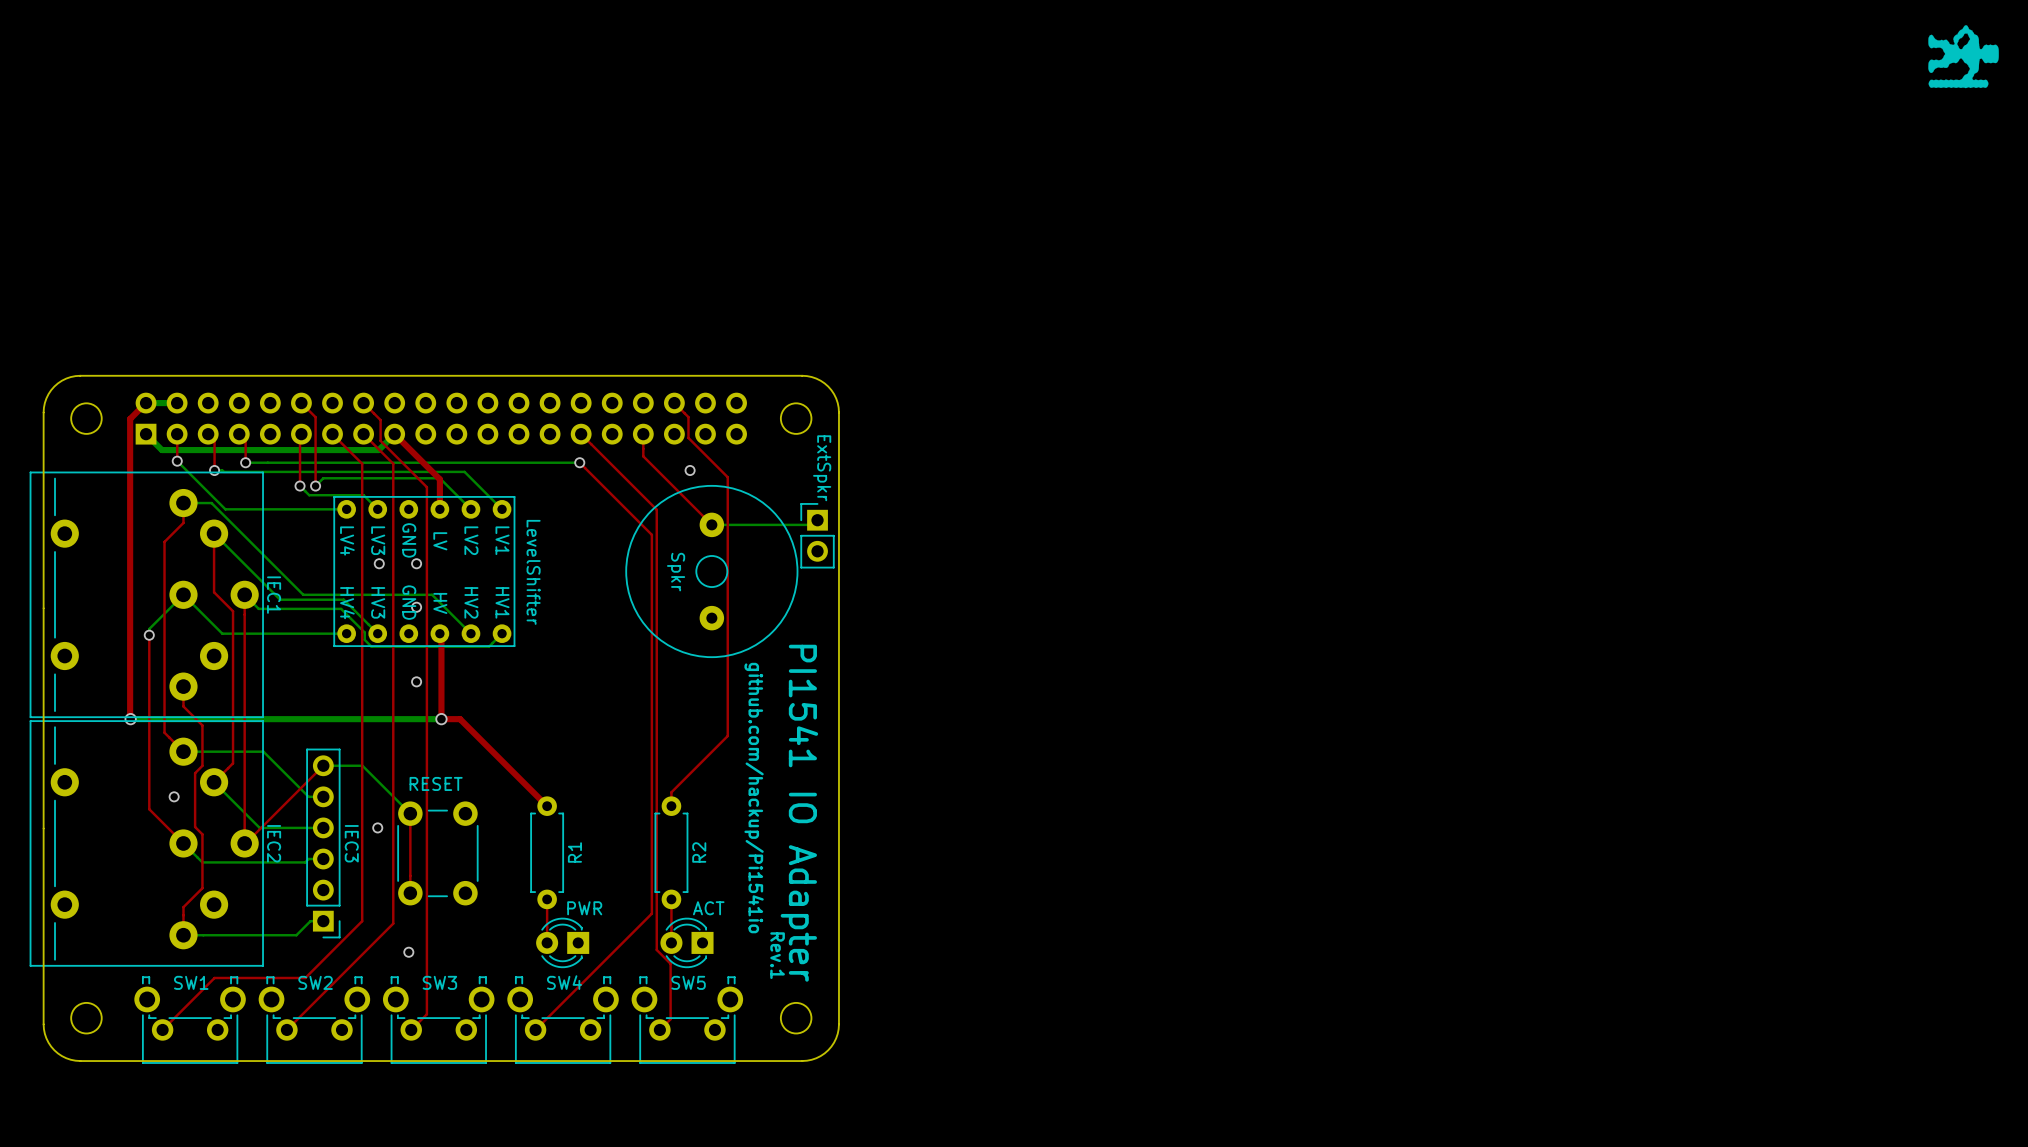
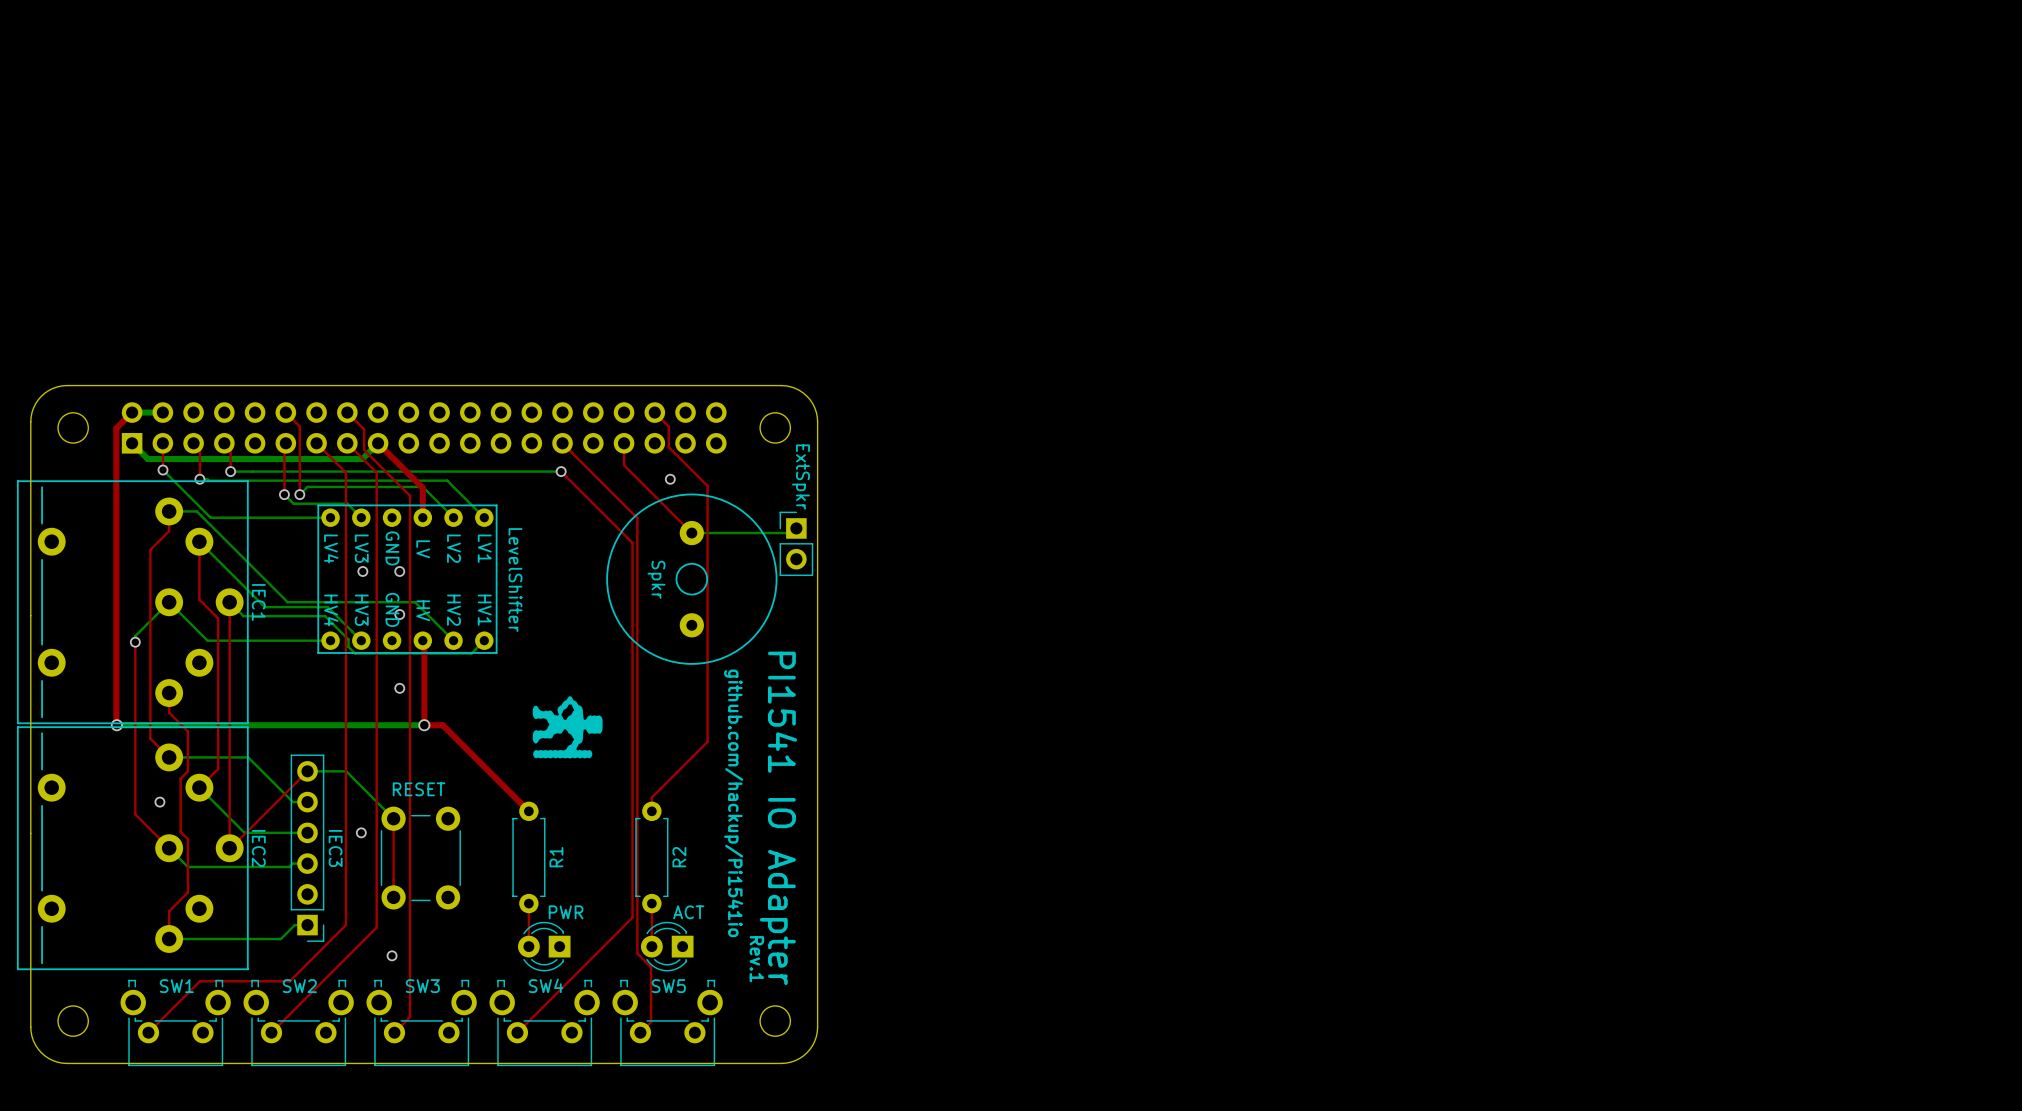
drawing: [1928, 25, 1999, 89] -> none
drawing: none -> [532, 696, 603, 759]

